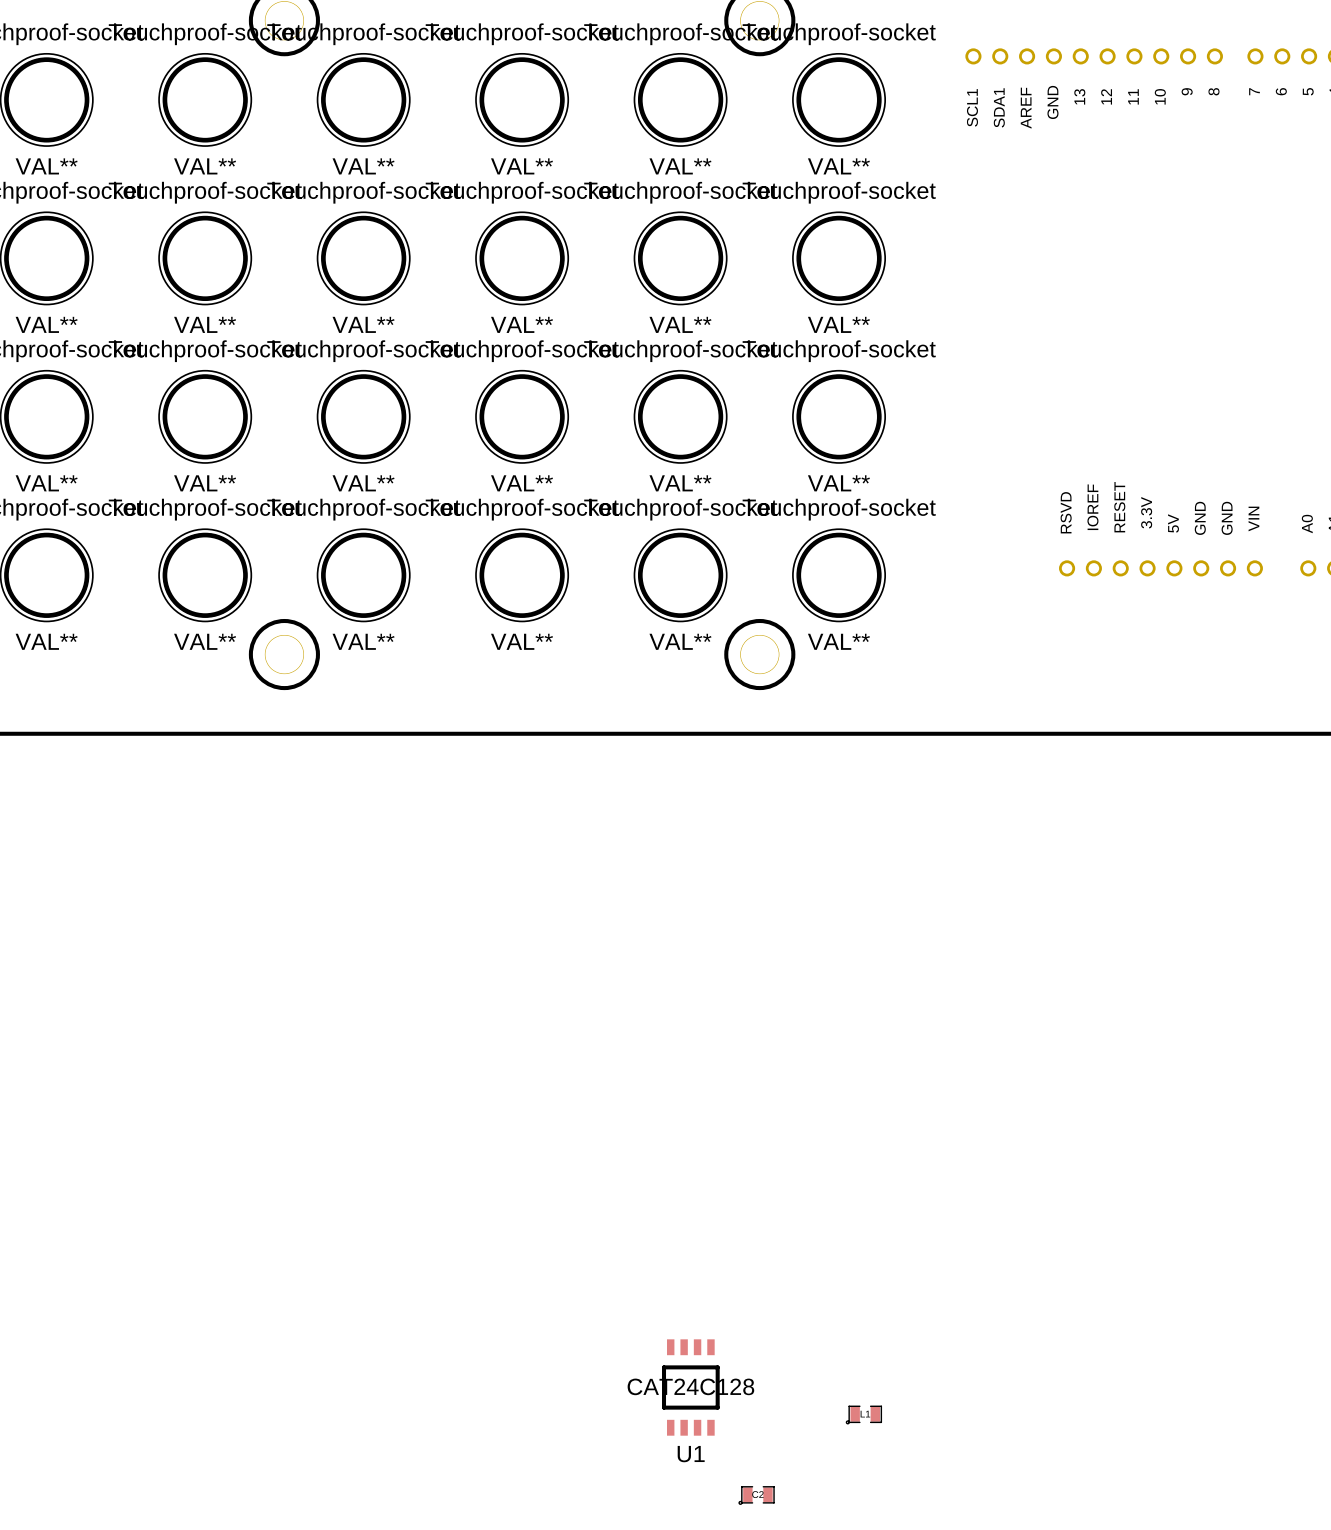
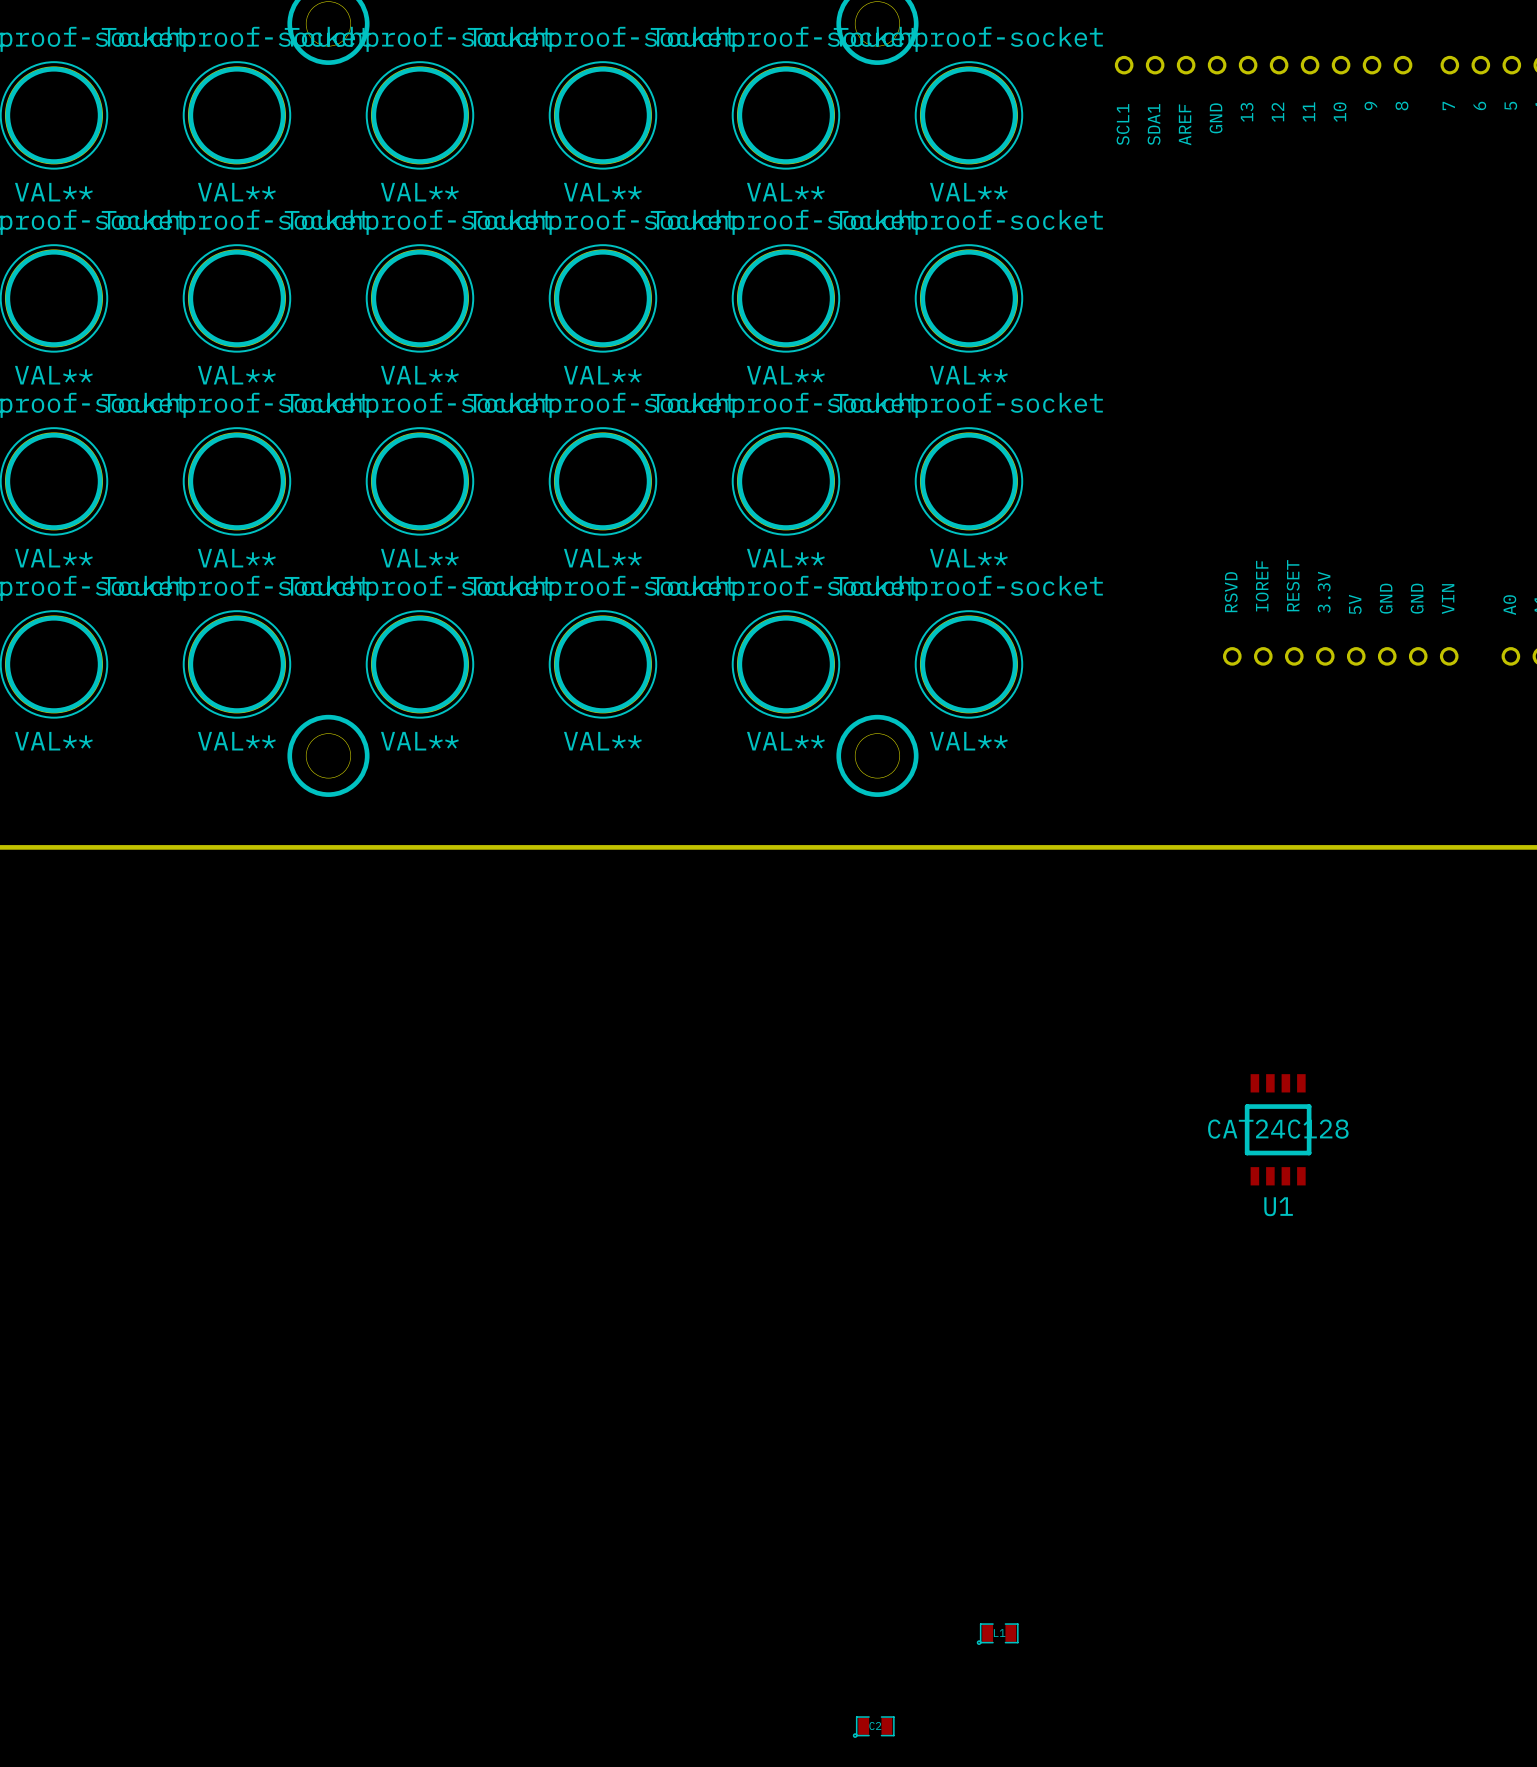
U1 position: (690, 1387) -> (1278, 1129)

